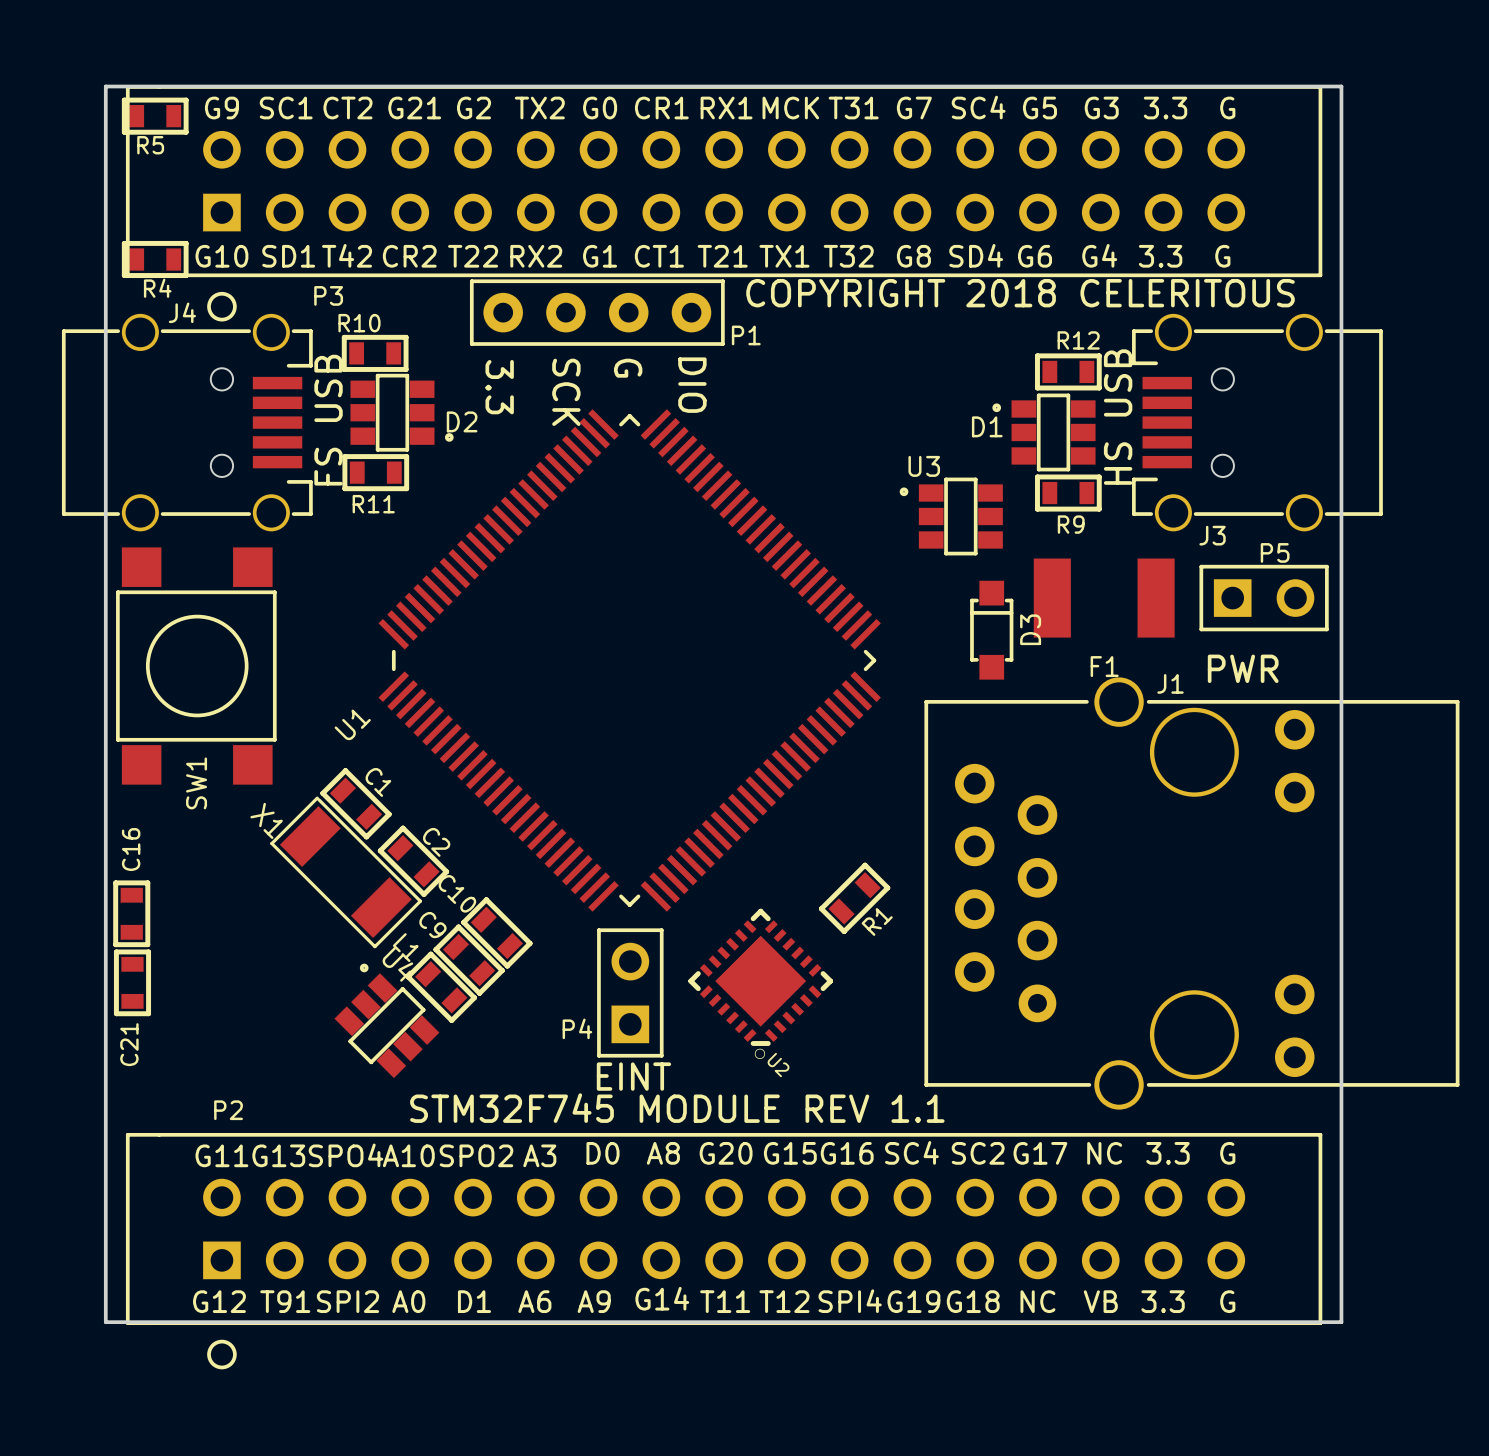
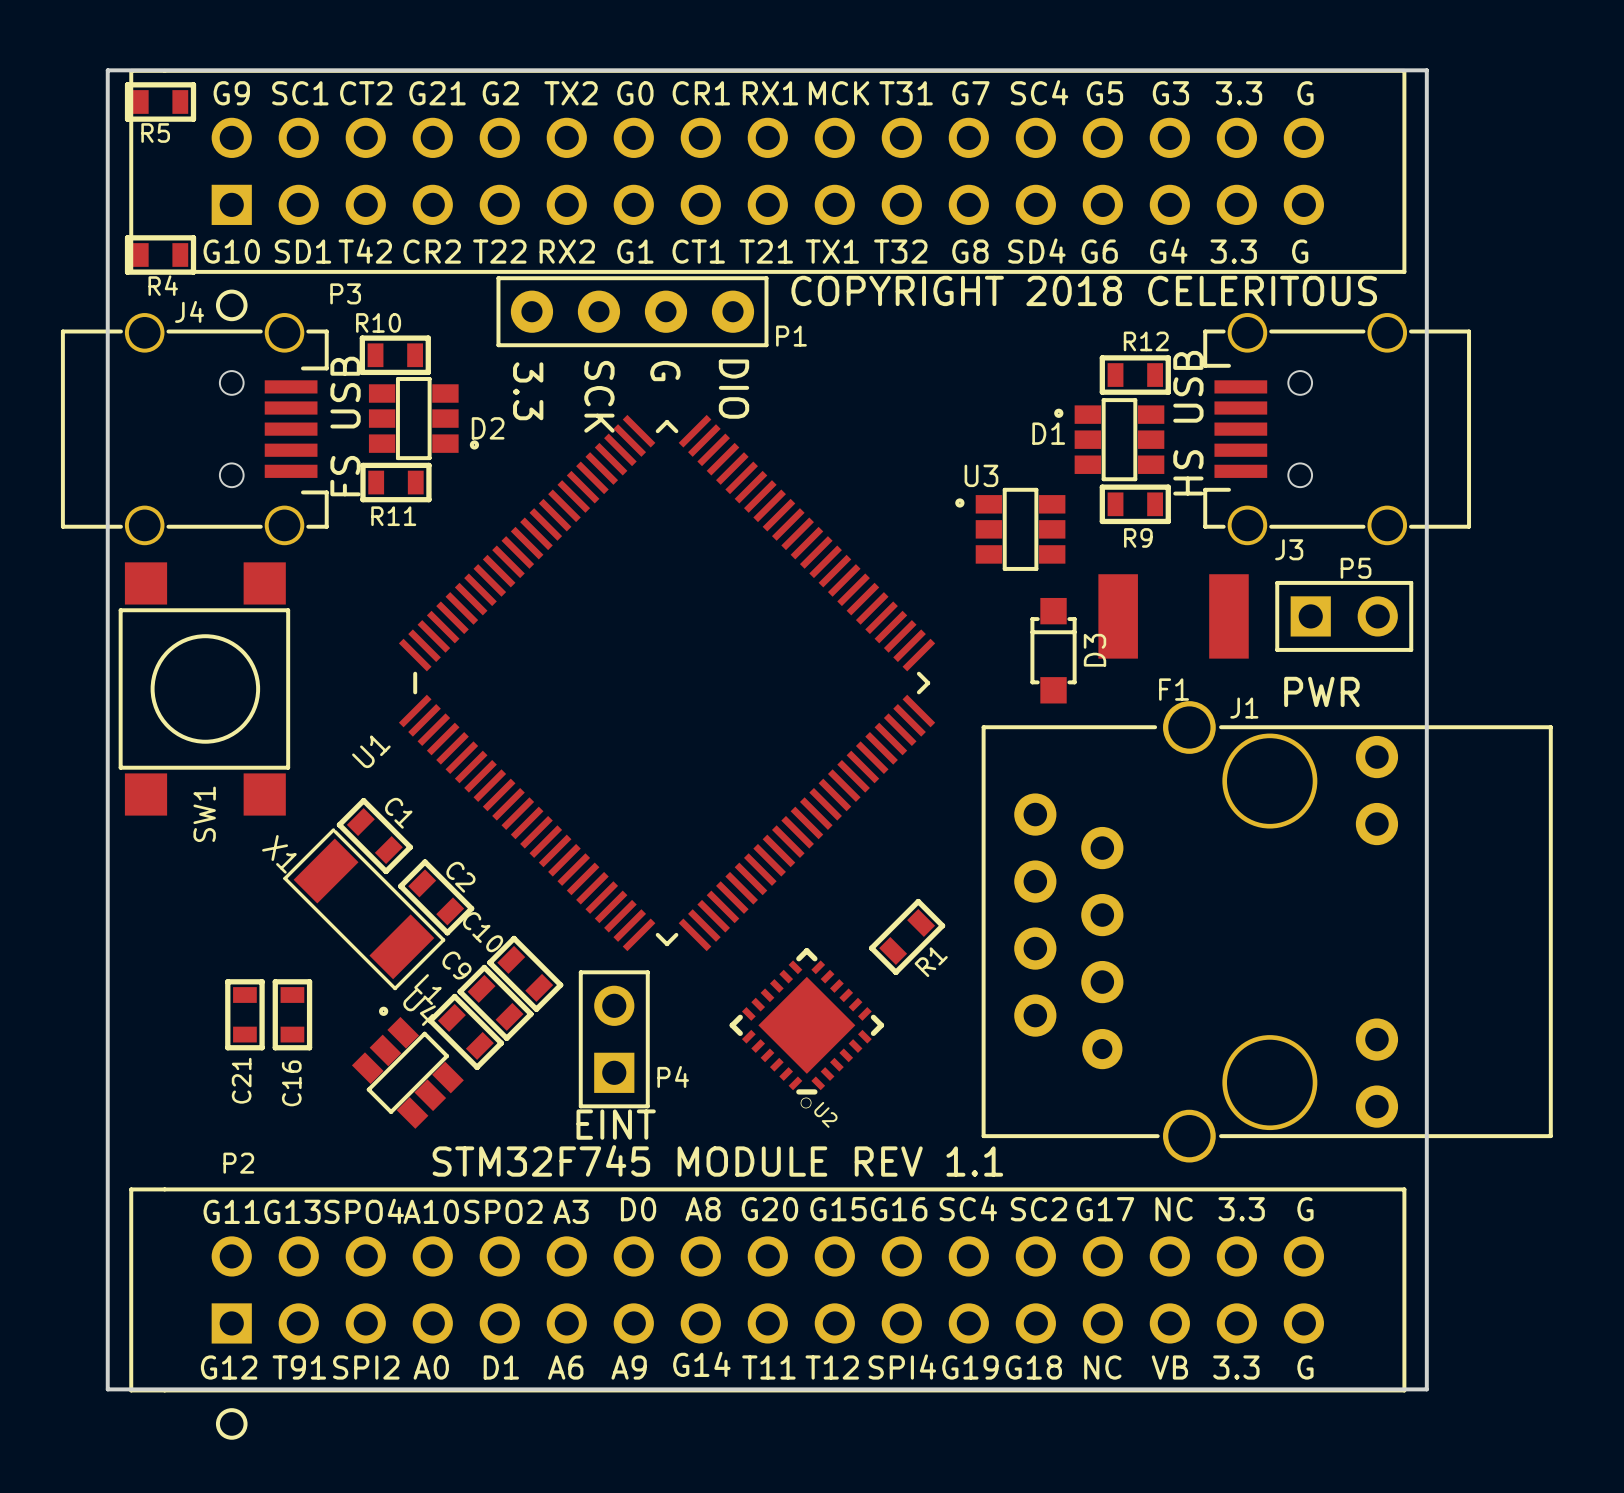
C16 name position: C16 (131, 849) -> C16 (291, 1083)
C16 position: (131, 913) -> (292, 1014)
C21 position: (132, 982) -> (244, 1014)
P4 position: (630, 992) -> (614, 1039)
P4 name position: P4 (577, 1028) -> P4 (673, 1076)
text position: EINT (633, 1076) -> EINT (616, 1124)

